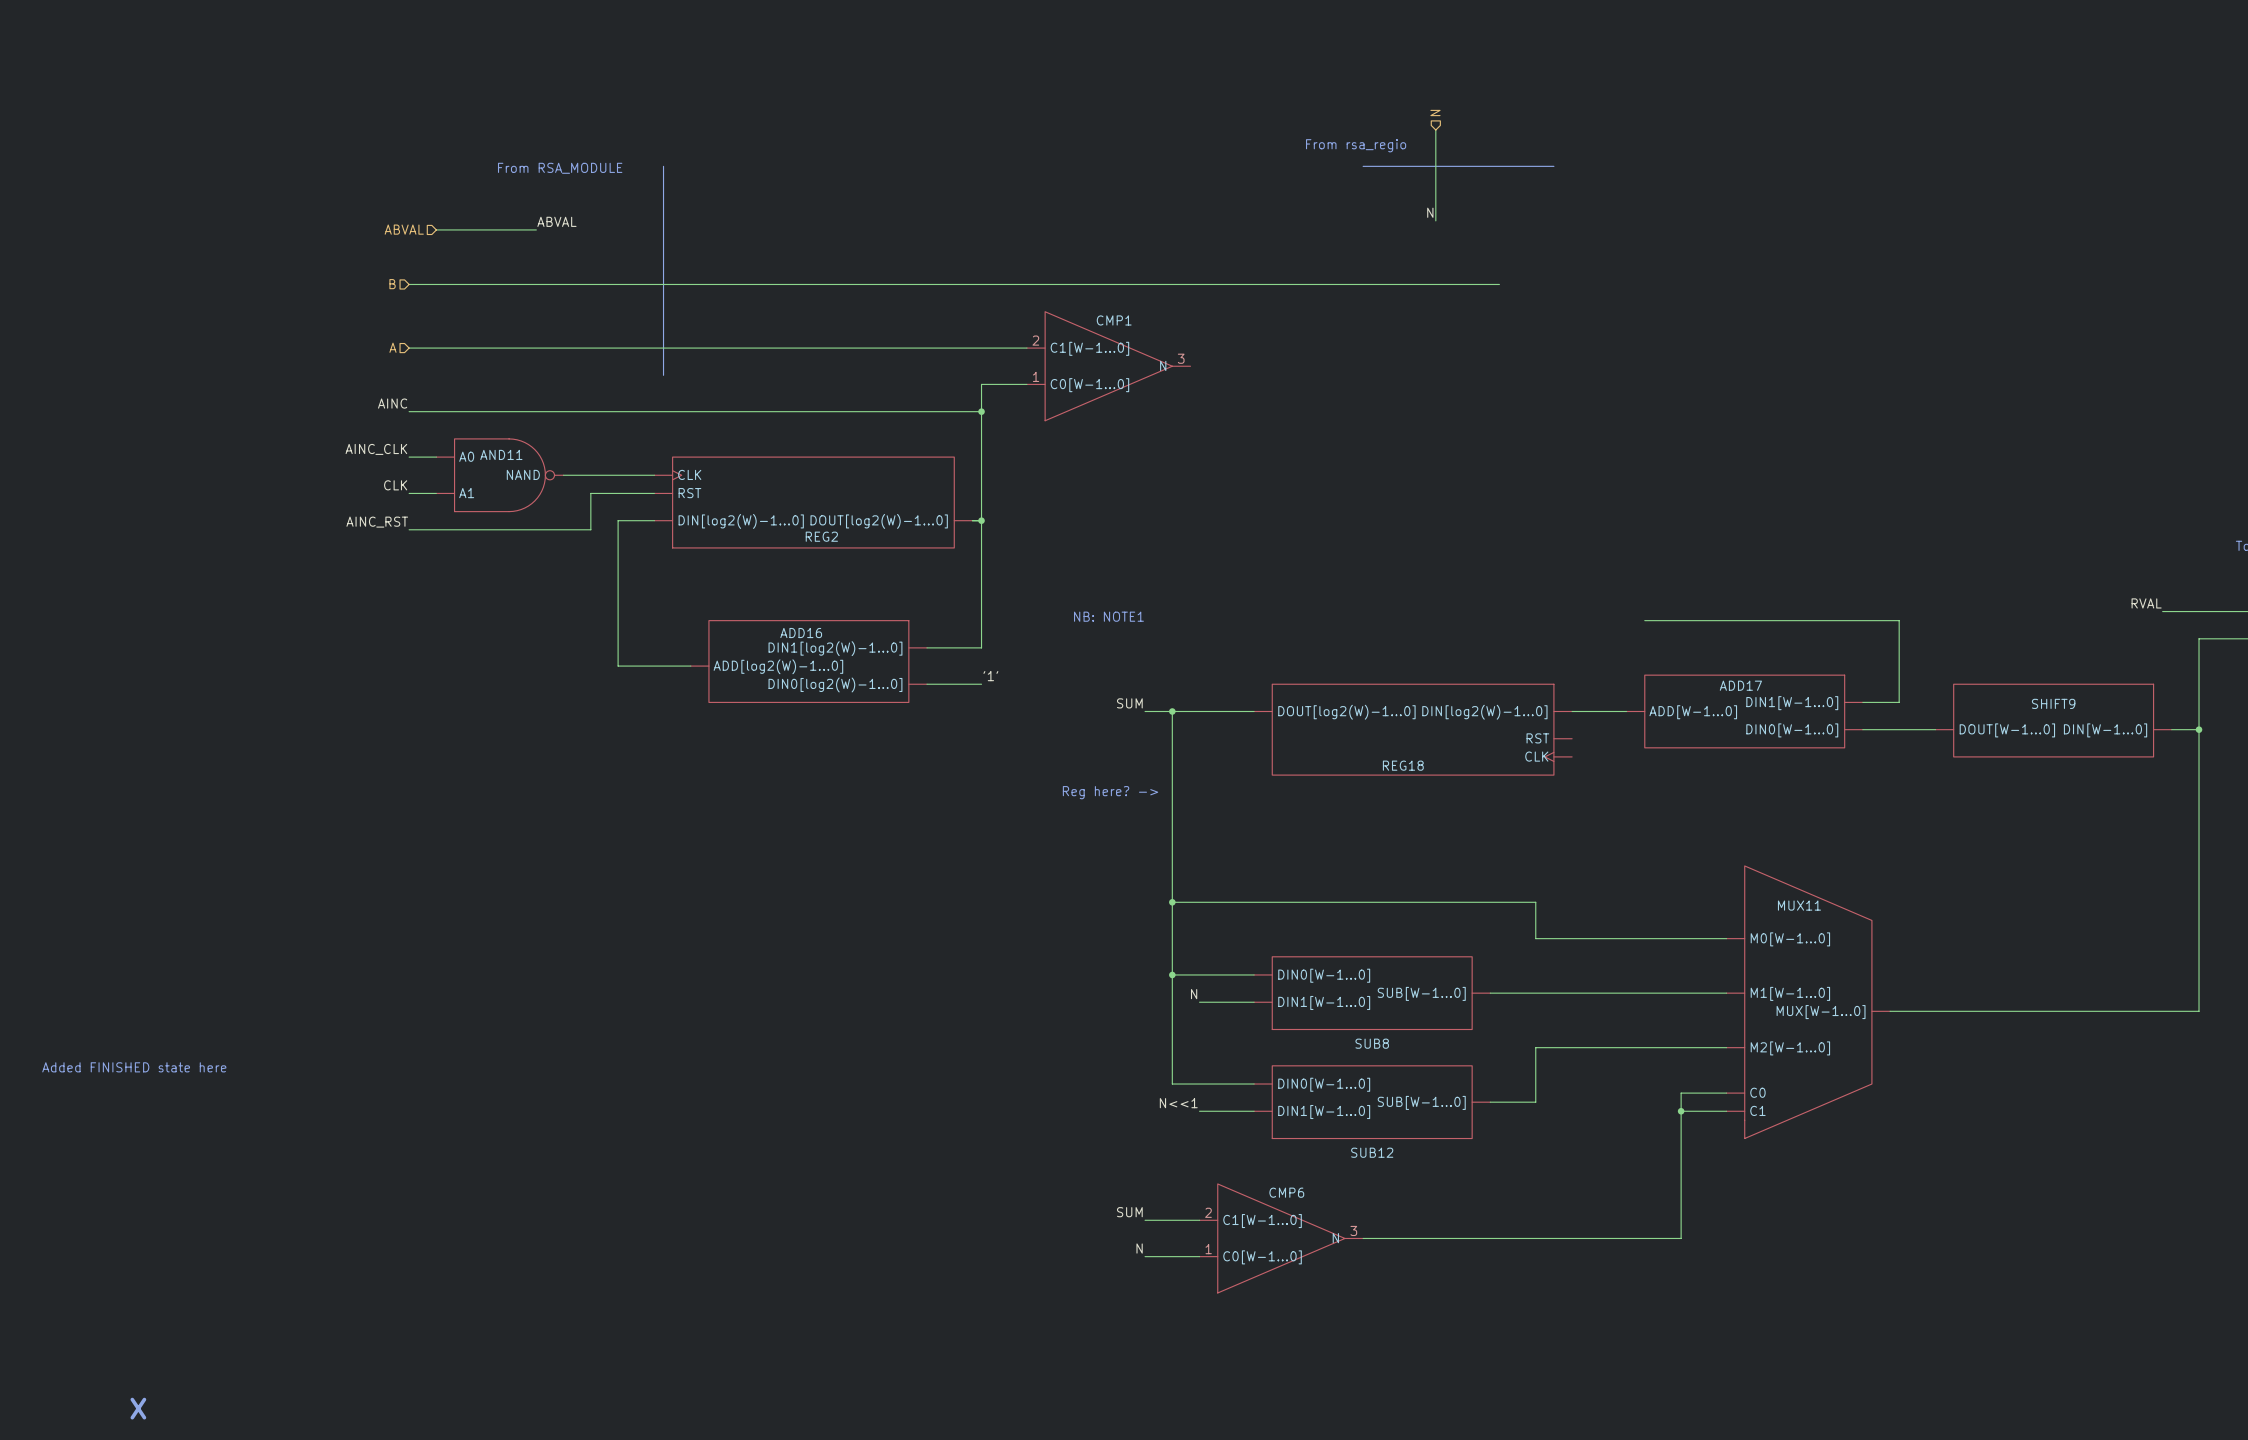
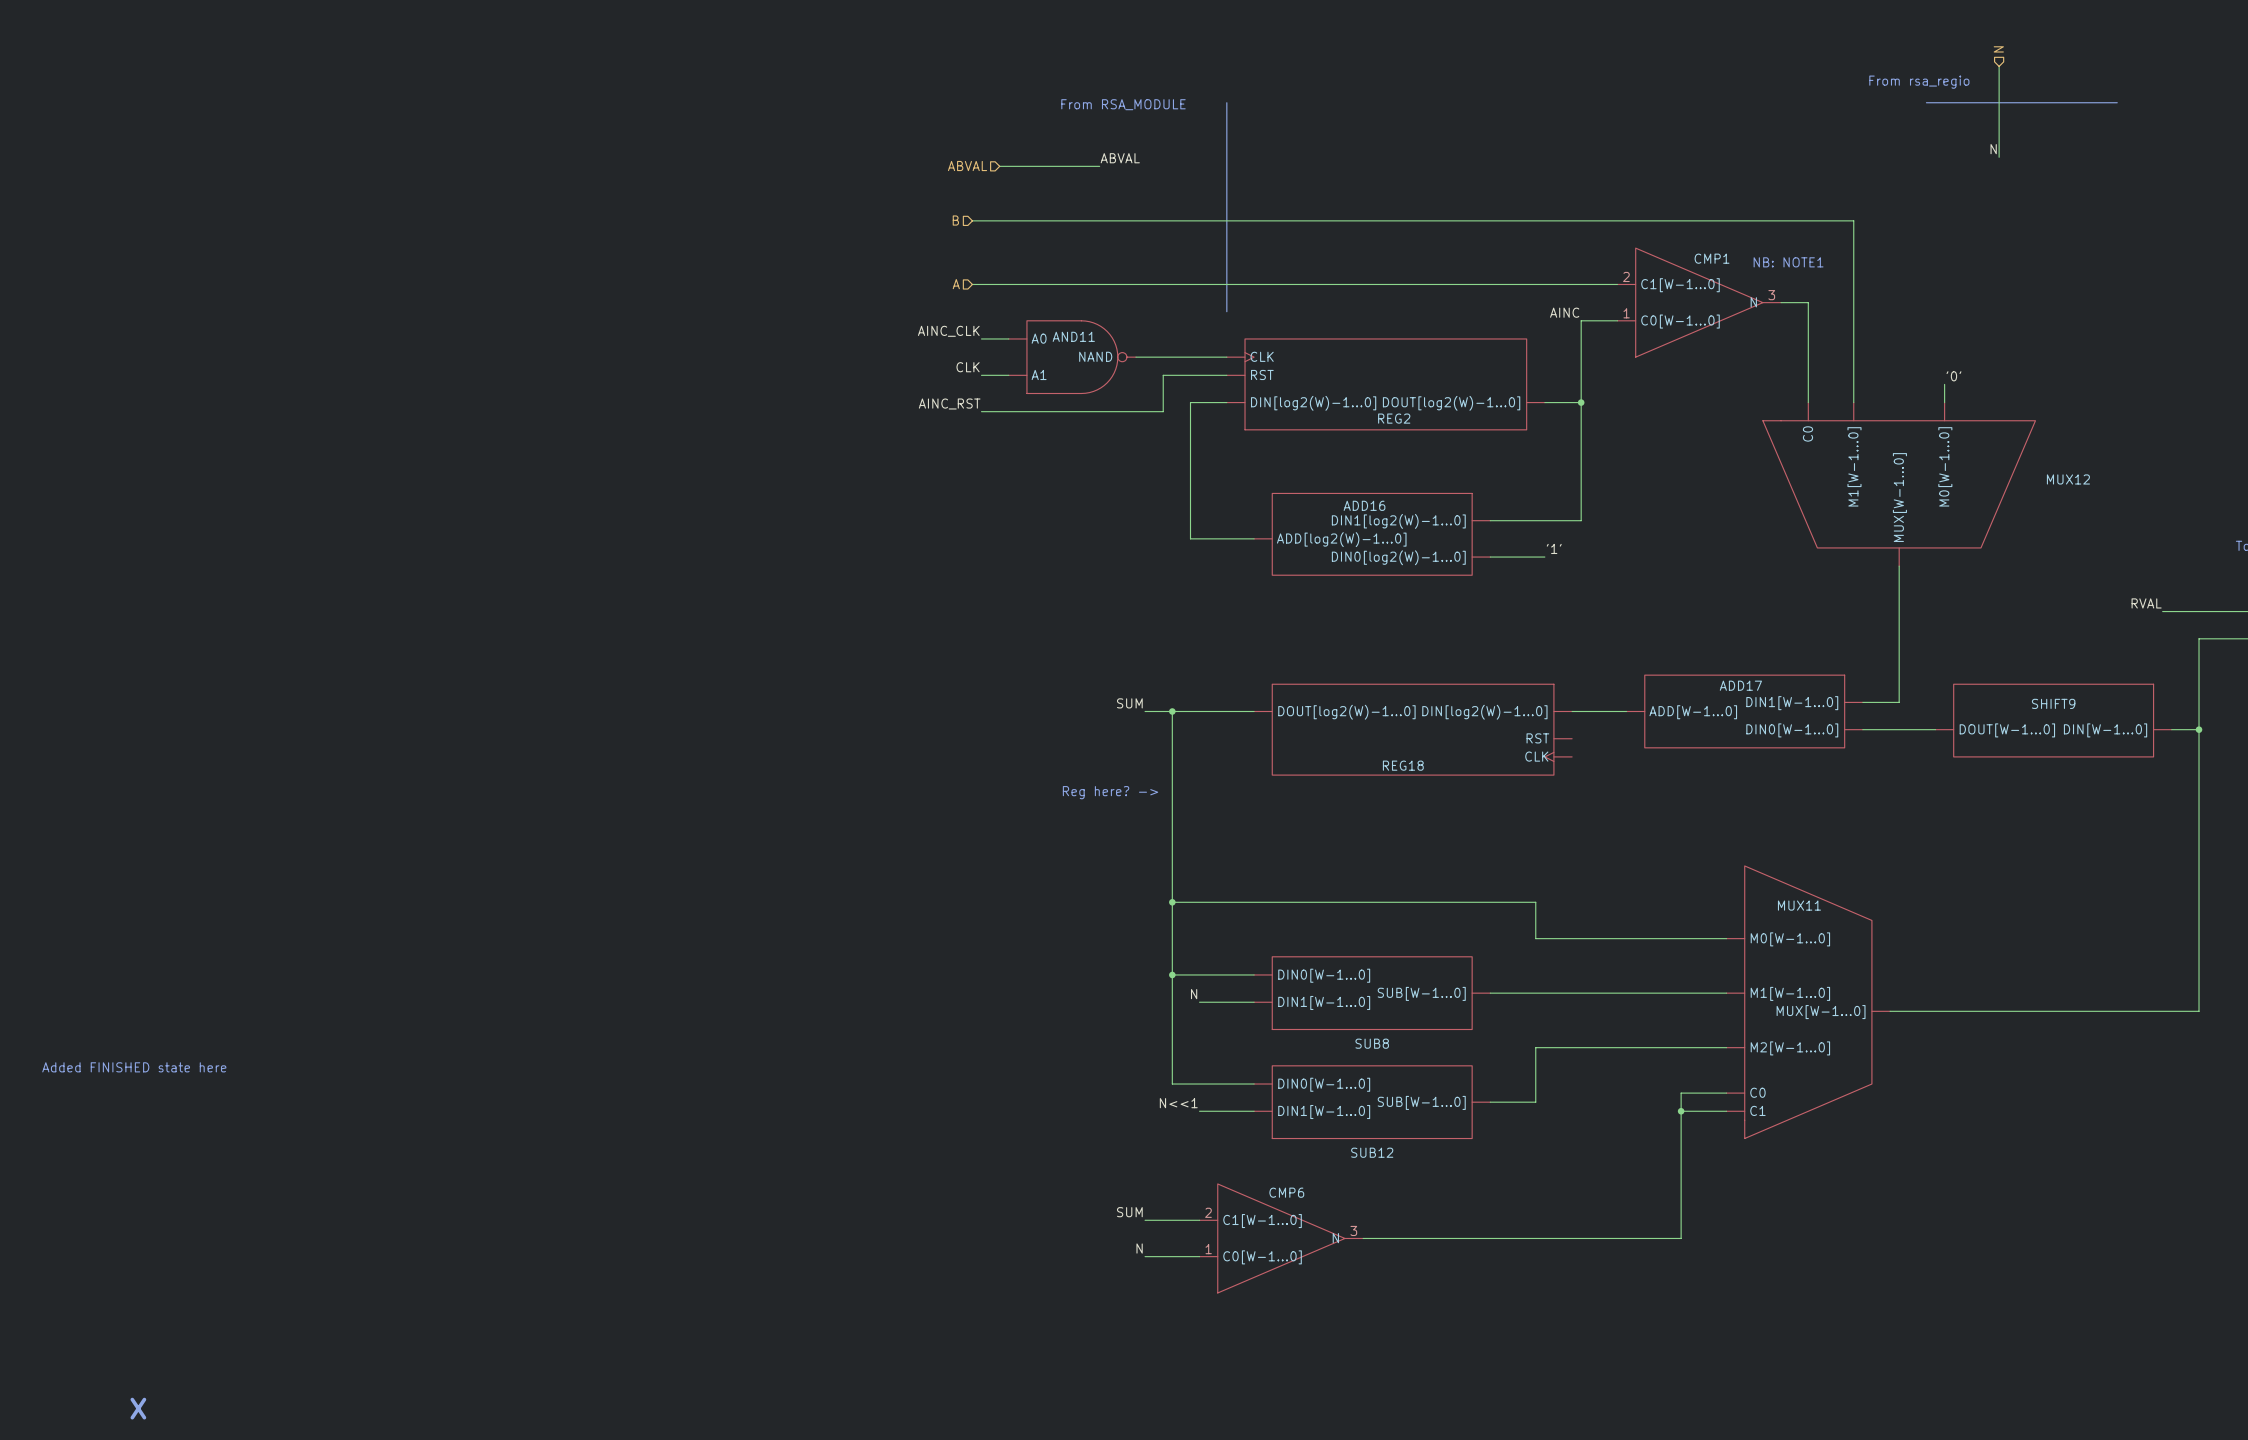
hierarchical label: none -> N (1998, 49)
wire: none -> (1999, 66) (1999, 157)
text: none -> From rsa_regio (1919, 82)
line: none -> (1226, 102) (1226, 311)
line: none -> (1926, 102) (2117, 102)
text: none -> From RSA_MODULE (1123, 104)
hierarchical label: N (1435, 112) -> none
wire: (1435, 130) (1435, 220) -> none
text: From rsa_regio (1356, 145) -> none
label: none -> N (1993, 149)
label: none -> ABVAL (1120, 158)
line: (663, 166) (663, 375) -> none
hierarchical label: none -> ABVAL (967, 166)
wire: none -> (999, 166) (1099, 166)
line: (1363, 166) (1553, 166) -> none
text: From RSA_MODULE (560, 168) -> none
label: N (1430, 212) -> none
hierarchical label: none -> B (955, 220)
wire: none -> (972, 220) (1853, 220) (1853, 402)
label: ABVAL (556, 221) -> none
hierarchical label: ABVAL (404, 229) -> none
wire: (436, 229) (536, 229) -> none
text: none -> NB: NOTE1 (1788, 262)
hierarchical label: B (392, 284) -> none
wire: (409, 284) (972, 284) -> none
hierarchical label: none -> A (956, 284)
wire: none -> (1499, 284) (1617, 284)
wire: none -> (1781, 302) (1808, 302) (1808, 402)
label: none -> AINC (1564, 312)
CMP1 name position: CMP1 (1114, 320) -> CMP1 (1712, 258)
wire: none -> (1617, 320) (1581, 320) (1581, 520) (1490, 520)
label: none -> AINC_CLK (948, 331)
wire: none -> (981, 338) (1008, 338)
hierarchical label: A (392, 347) -> none
wire: (409, 348) (1026, 348) -> none
wire: none -> (1135, 357) (1226, 357)
CMP1 position: (1108, 366) -> (1699, 302)
label: none -> CLK (968, 367)
wire: none -> (981, 375) (1008, 375)
label: none -> '0' (1953, 376)
wire: (1026, 384) (981, 384) (981, 647) (927, 647) -> none
wire: none -> (1944, 384) (1944, 402)
wire: none -> (1226, 402) (1190, 402) (1190, 538) (1254, 538)
wire: none -> (1544, 402) (1581, 402)
junction: none -> (1581, 402)
label: AINC (392, 403) -> none
label: none -> AINC_RST (949, 403)
wire: (409, 411) (981, 411) -> (1226, 375) (1163, 375) (1163, 411) (981, 411)
junction: (981, 411) -> none
label: AINC_CLK (376, 449) -> none
wire: (409, 457) (436, 457) -> none
AND11 position: (499, 475) -> (1072, 357)
wire: (563, 475) (654, 475) -> none
MUX12: none -> (1899, 484)
label: CLK (395, 485) -> none
wire: (409, 493) (436, 493) -> none
wire: (654, 493) (590, 493) (590, 529) (409, 529) -> none
REG2 position: (813, 502) -> (1385, 384)
wire: (654, 520) (618, 520) (618, 666) (690, 666) -> none
wire: (972, 520) (981, 520) -> none
junction: (981, 520) -> none
label: AINC_RST (377, 522) -> none
label: none -> '1' (1554, 548)
wire: none -> (1490, 557) (1544, 557)
text: NB: NOTE1 (1108, 616) -> none
wire: (1644, 620) (1899, 620) -> (1899, 566) (1899, 620)
ADD16 position: (808, 661) -> (1372, 534)
label: '1' (990, 676) -> none
wire: (927, 684) (981, 684) -> none

